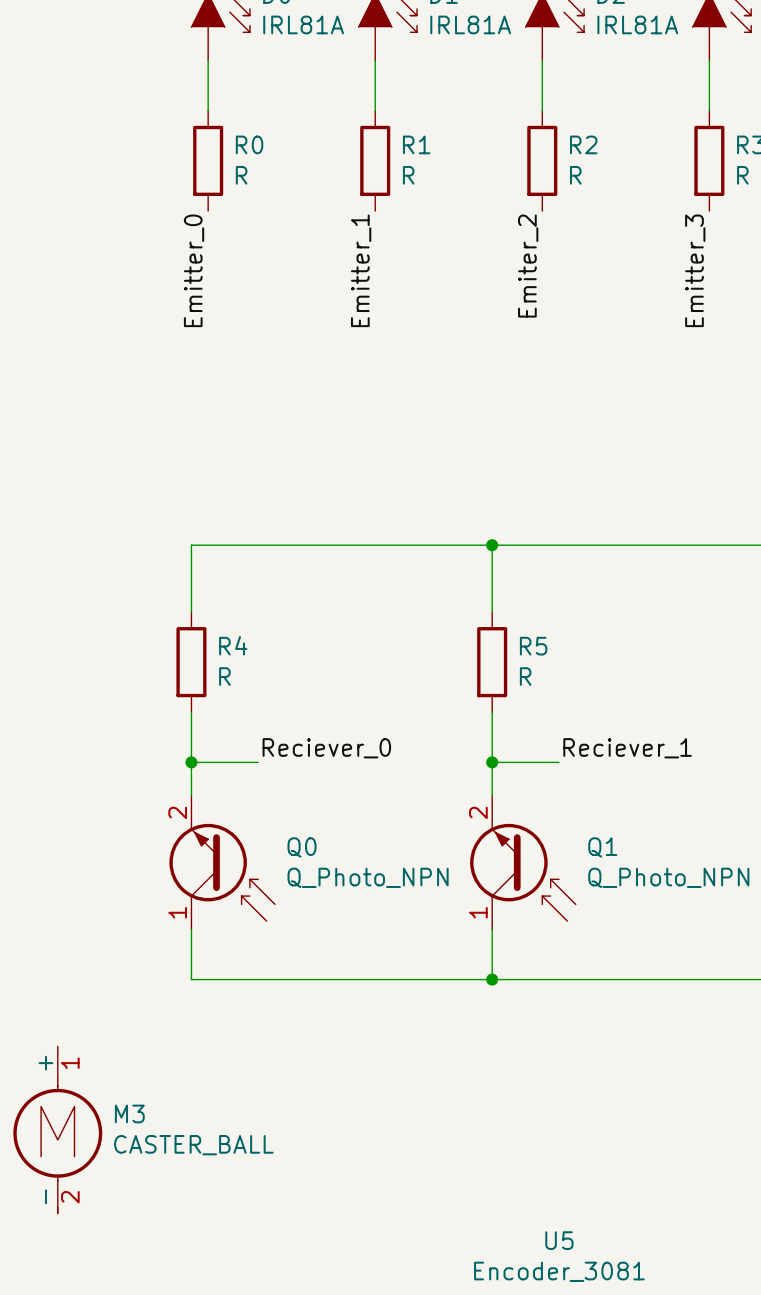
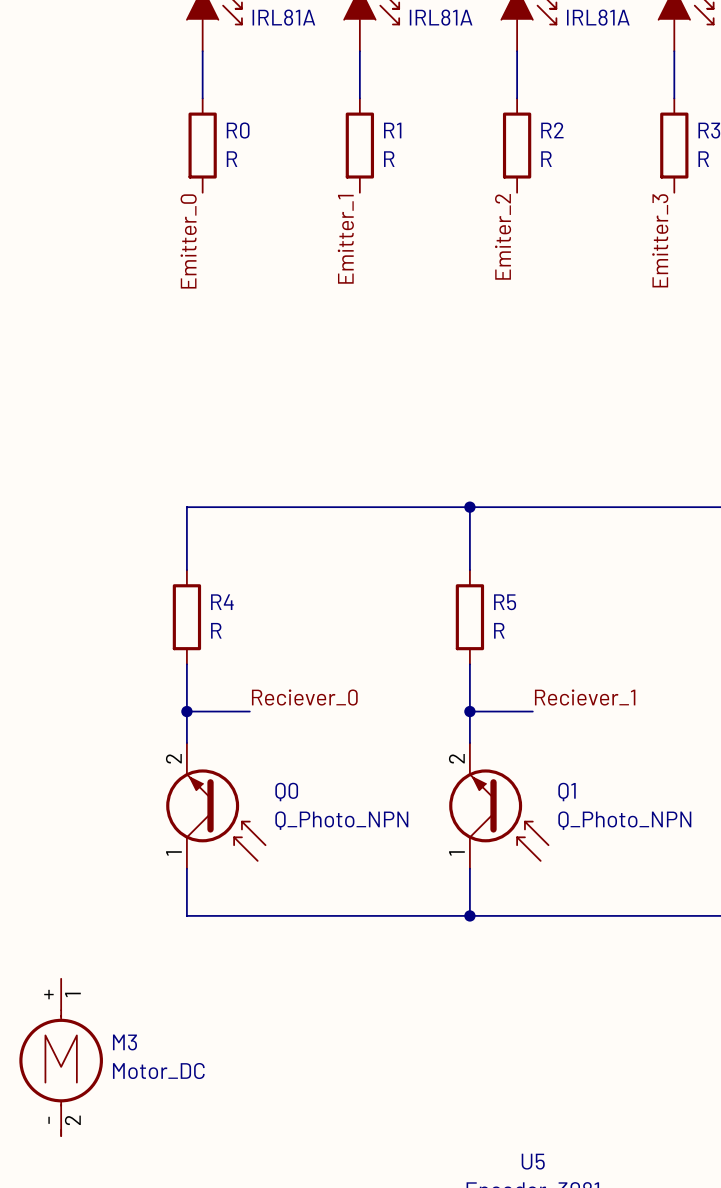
M3 value: CASTER_BALL (193, 1145) -> Motor_DC (158, 1071)

